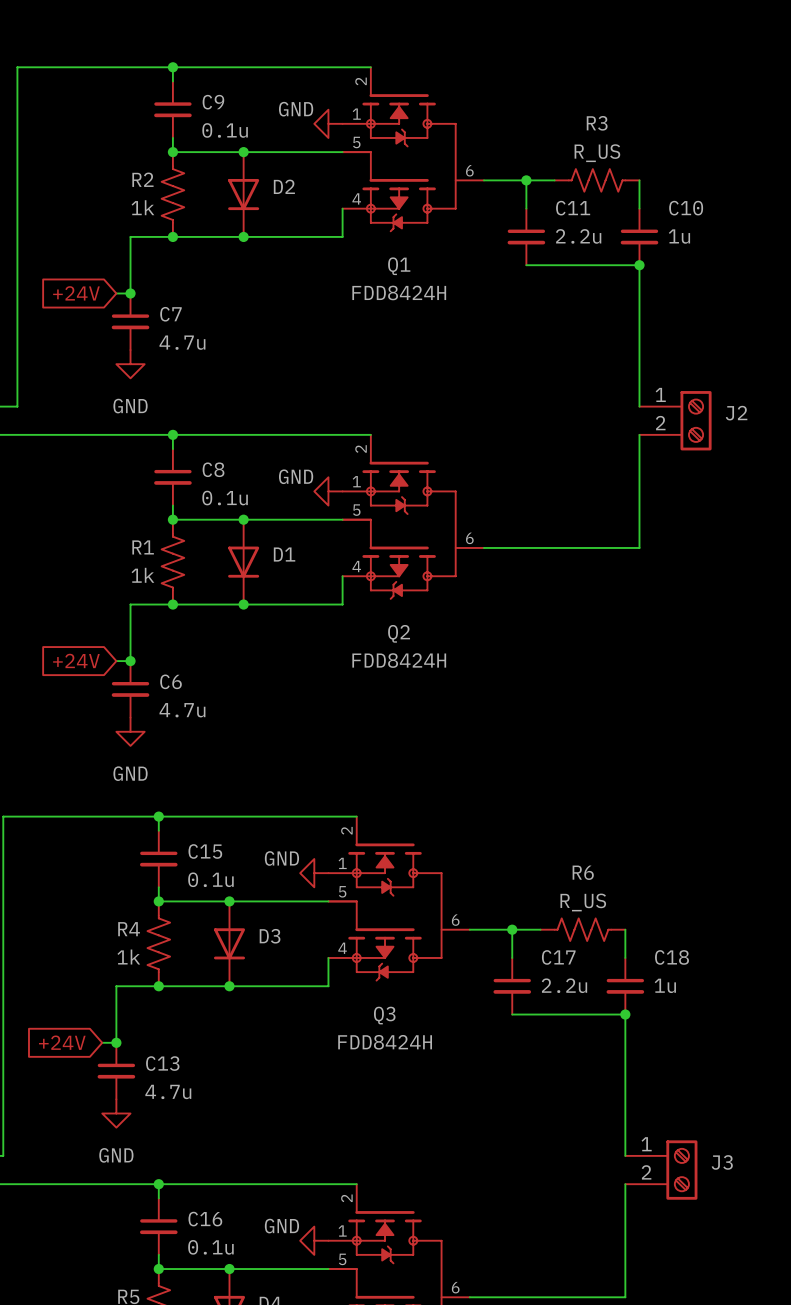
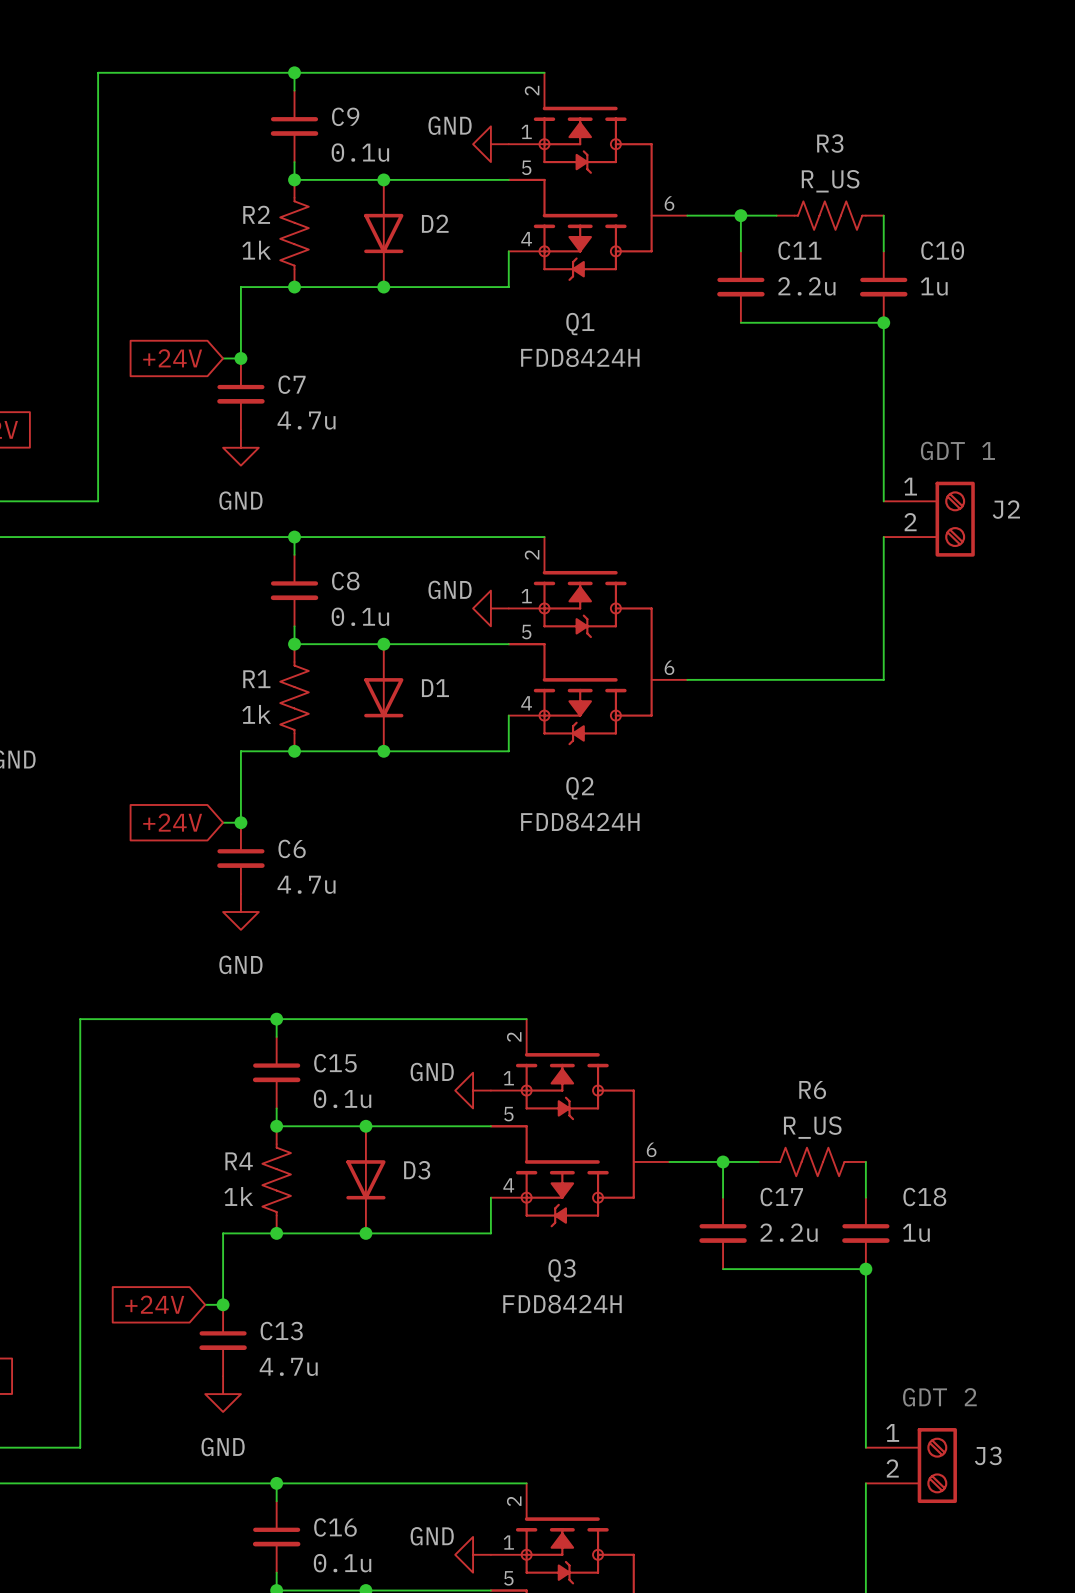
text: none -> GDT 1 (957, 450)
text: none -> GDT 2 (939, 1397)

